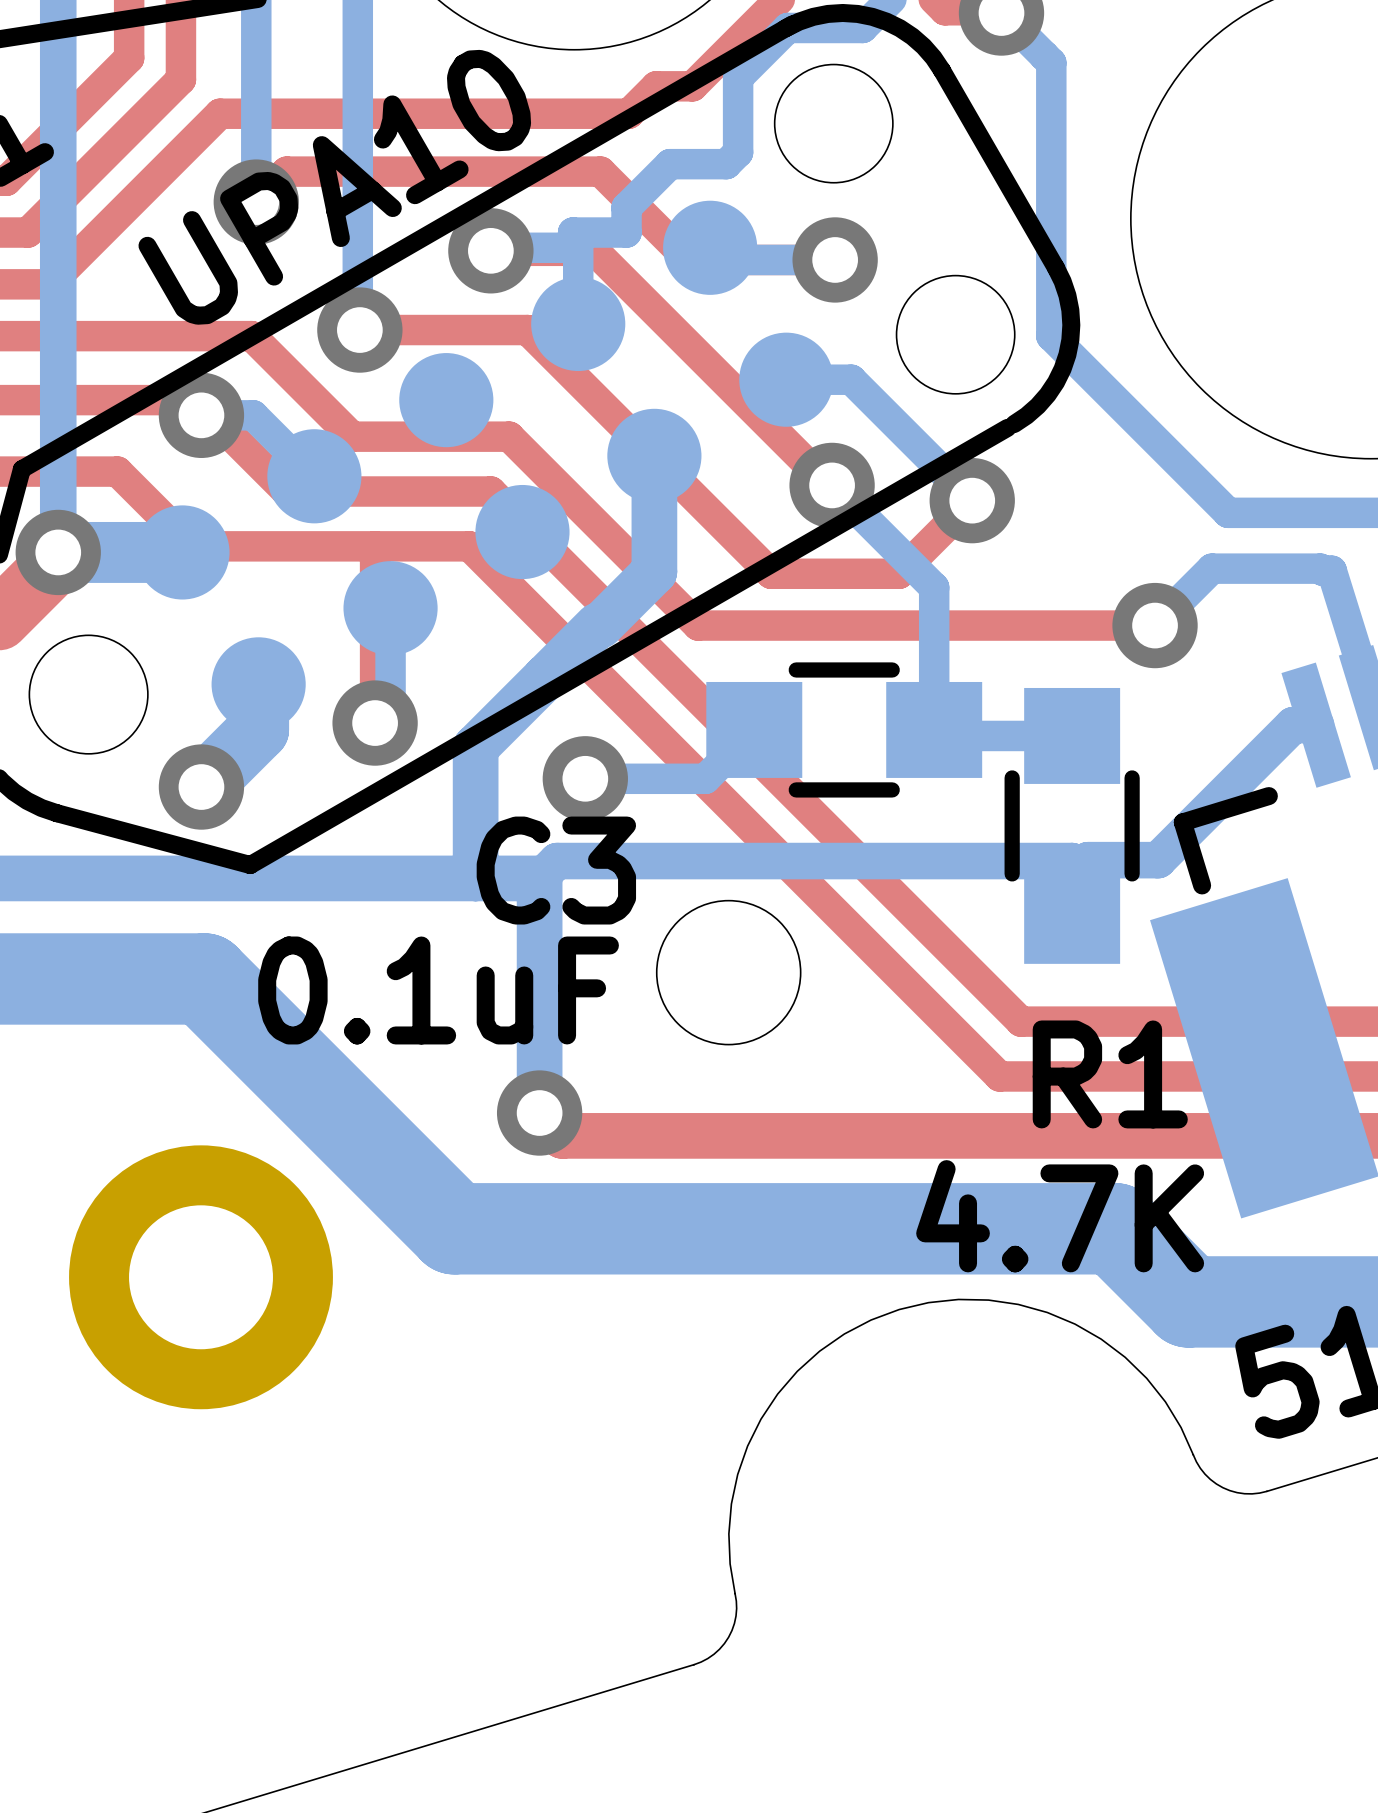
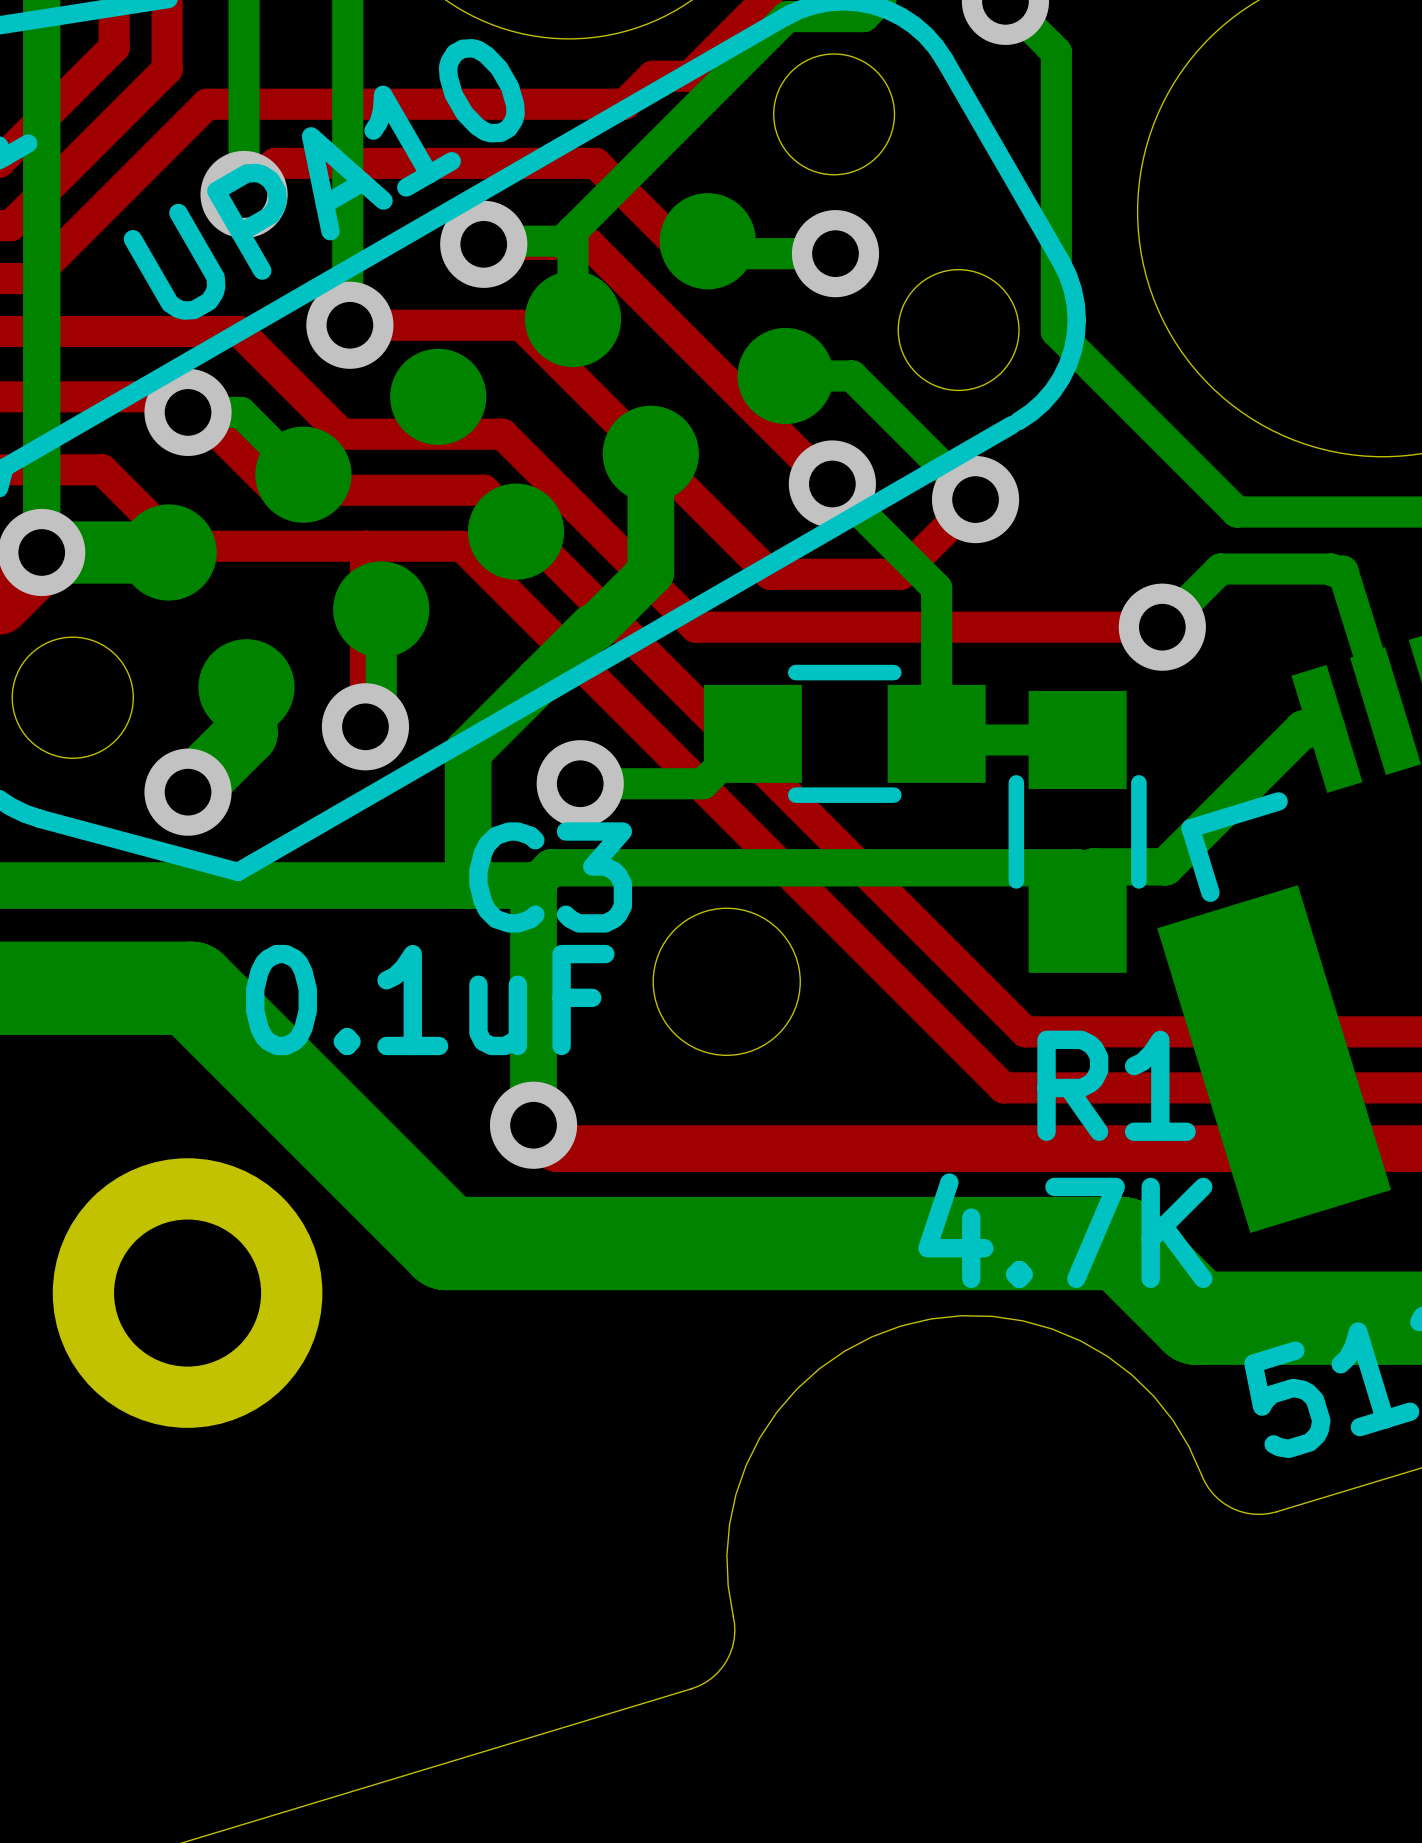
bottom track: (738, 77) (738, 152) (726, 164) (670, 164) (626, 207) (626, 232) (573, 232) -> (736, 67) (562, 240) (562, 243)

